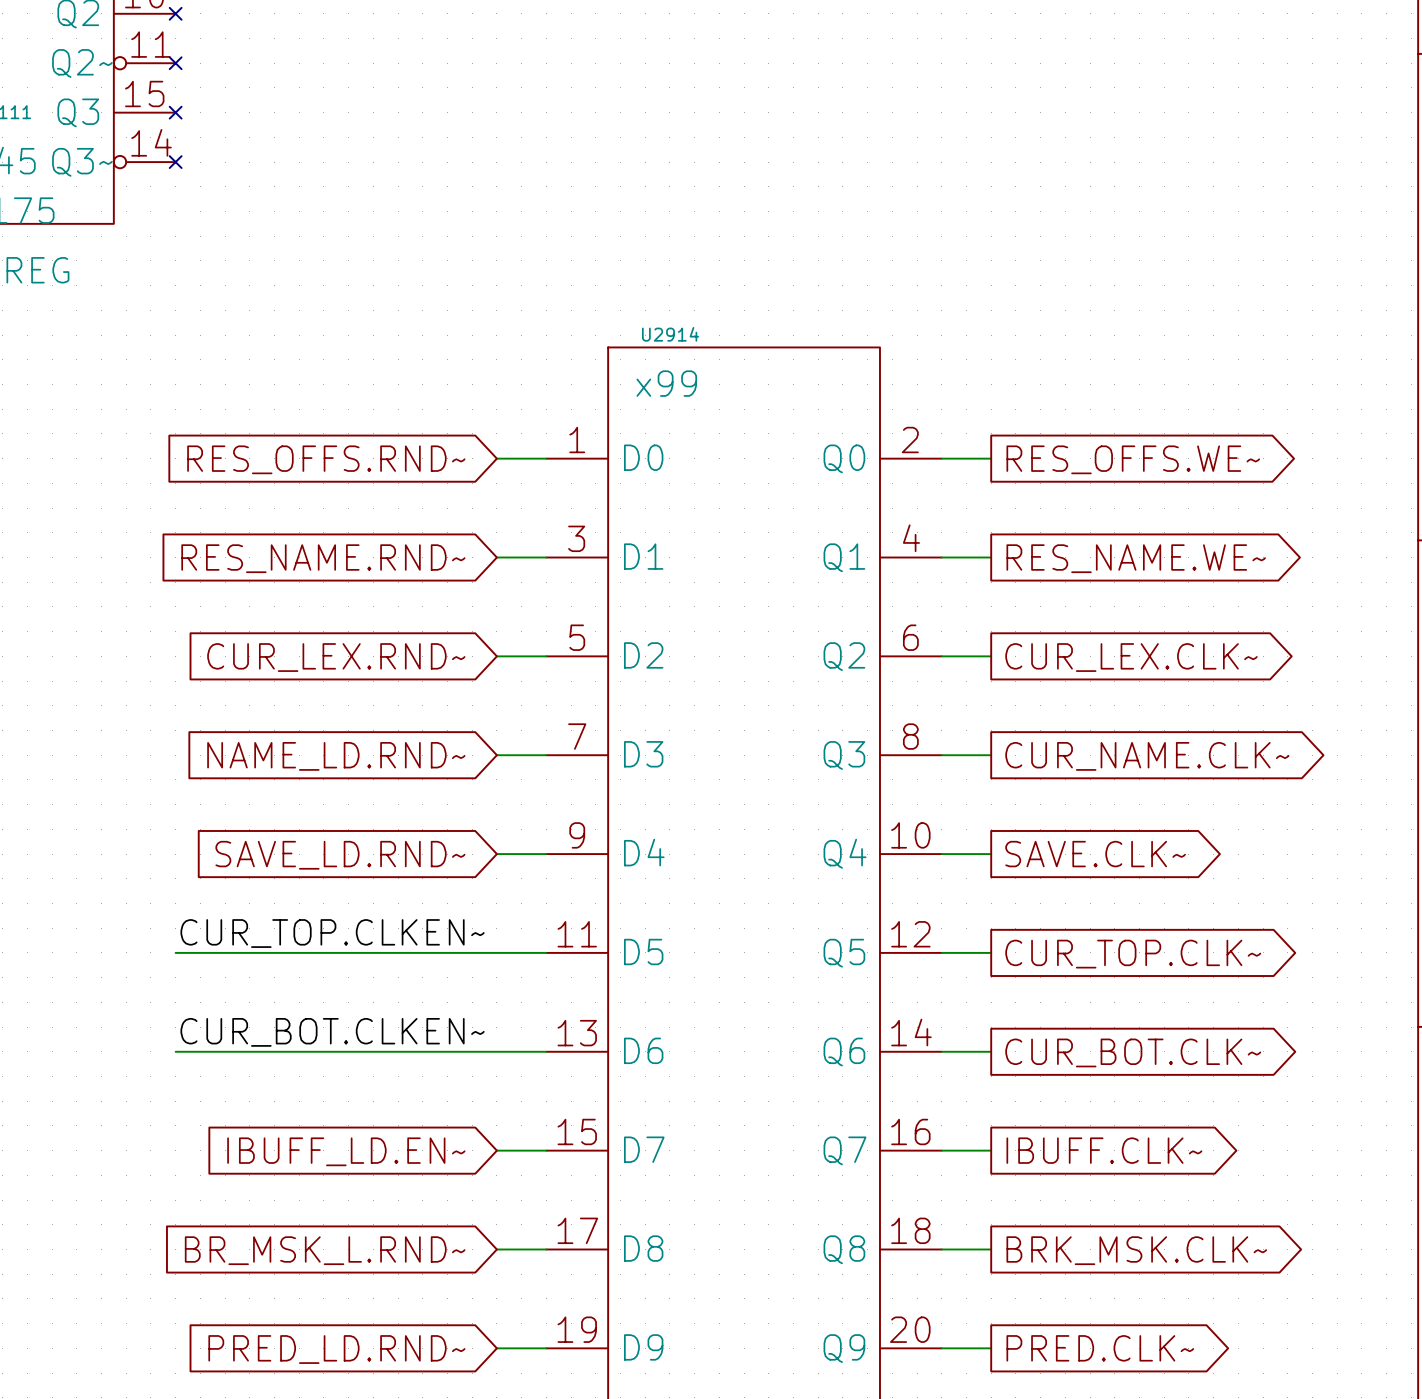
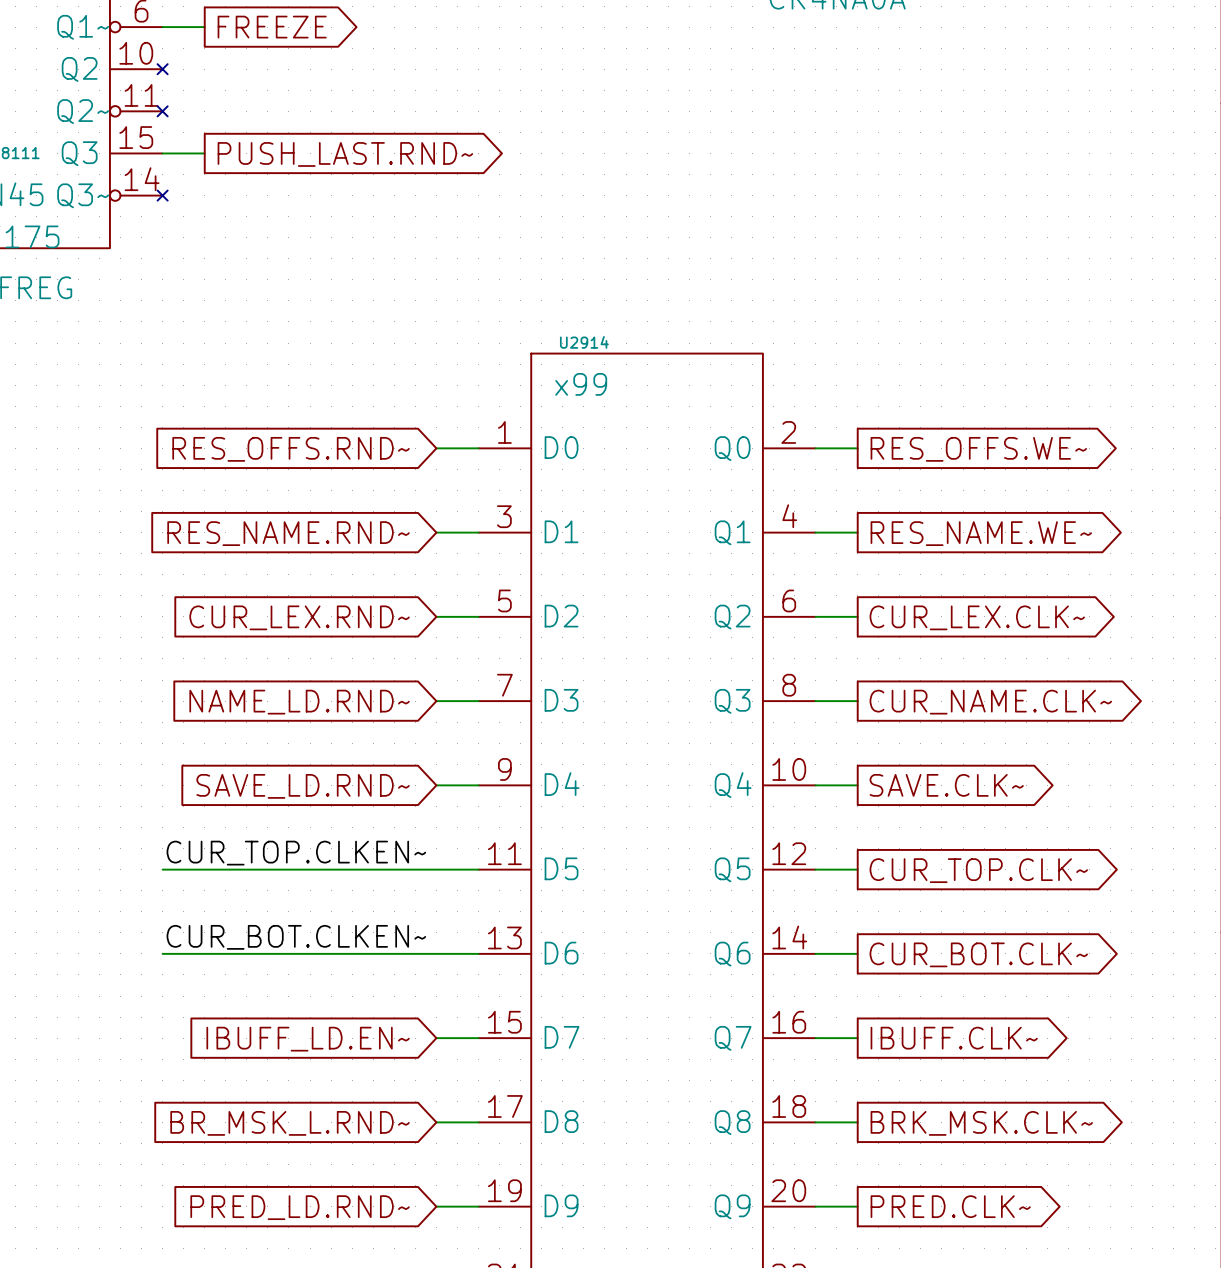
wire: none -> (162, 153) (204, 153)
no-connect mark: (175, 112) -> none
global label: none -> PUSH_LAST.RND~ (345, 154)

